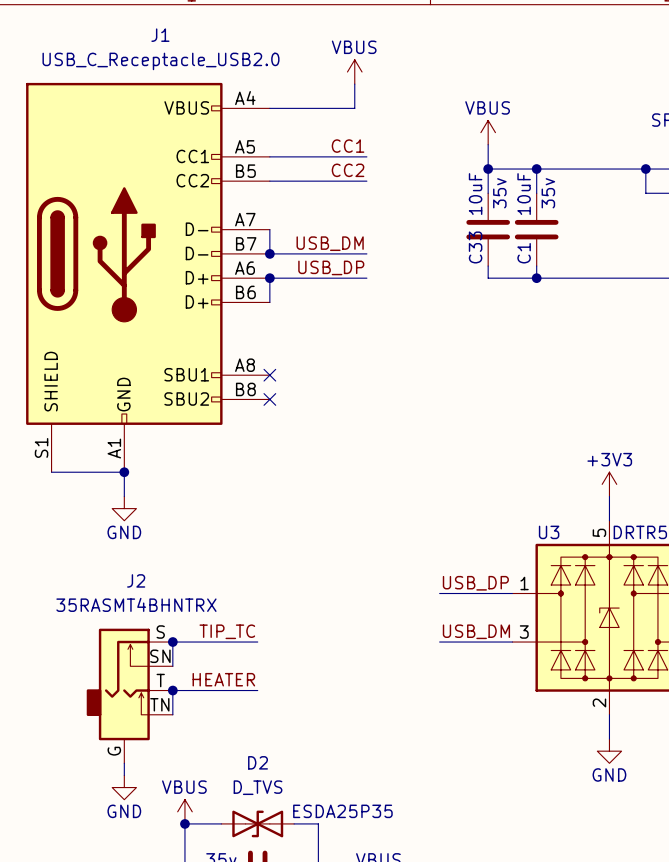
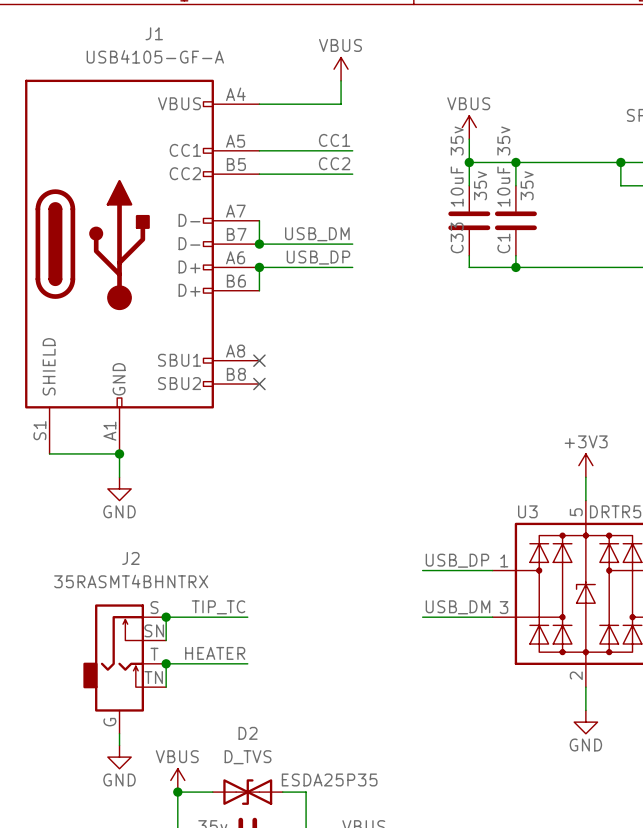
J1 value: USB_C_Receptacle_USB2.0 (161, 61) -> USB4105-GF-A (155, 56)
C33 value: 10uF (475, 194) -> 10uF 35v (457, 166)
C1 value: 10uF (524, 194) -> 10uF 35v (503, 166)

